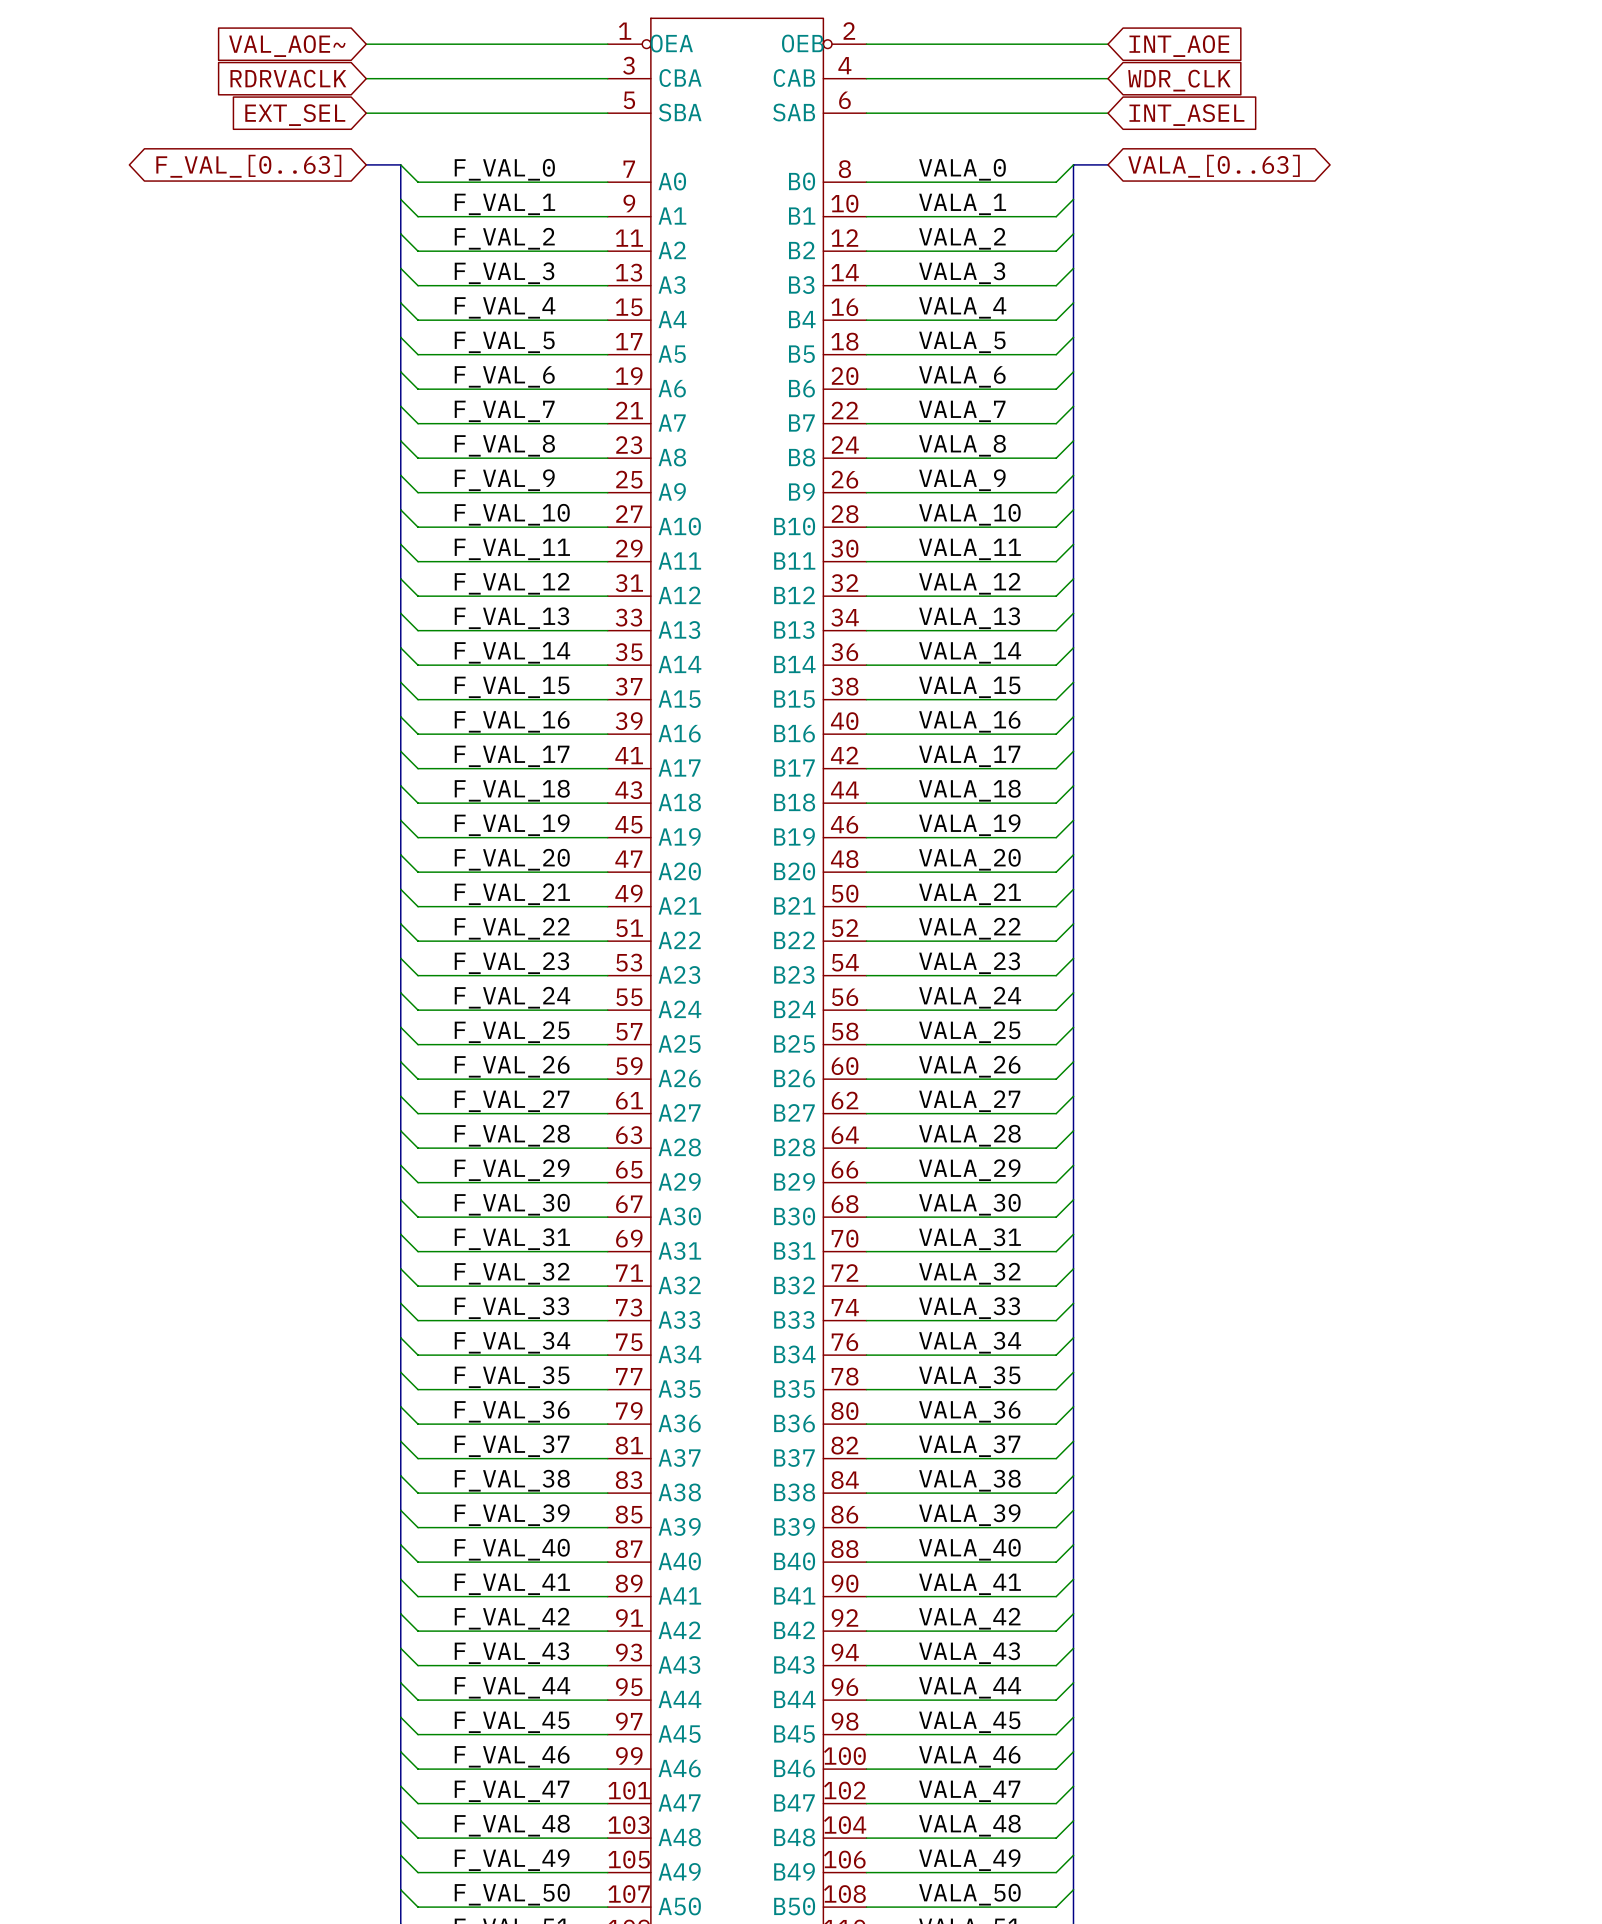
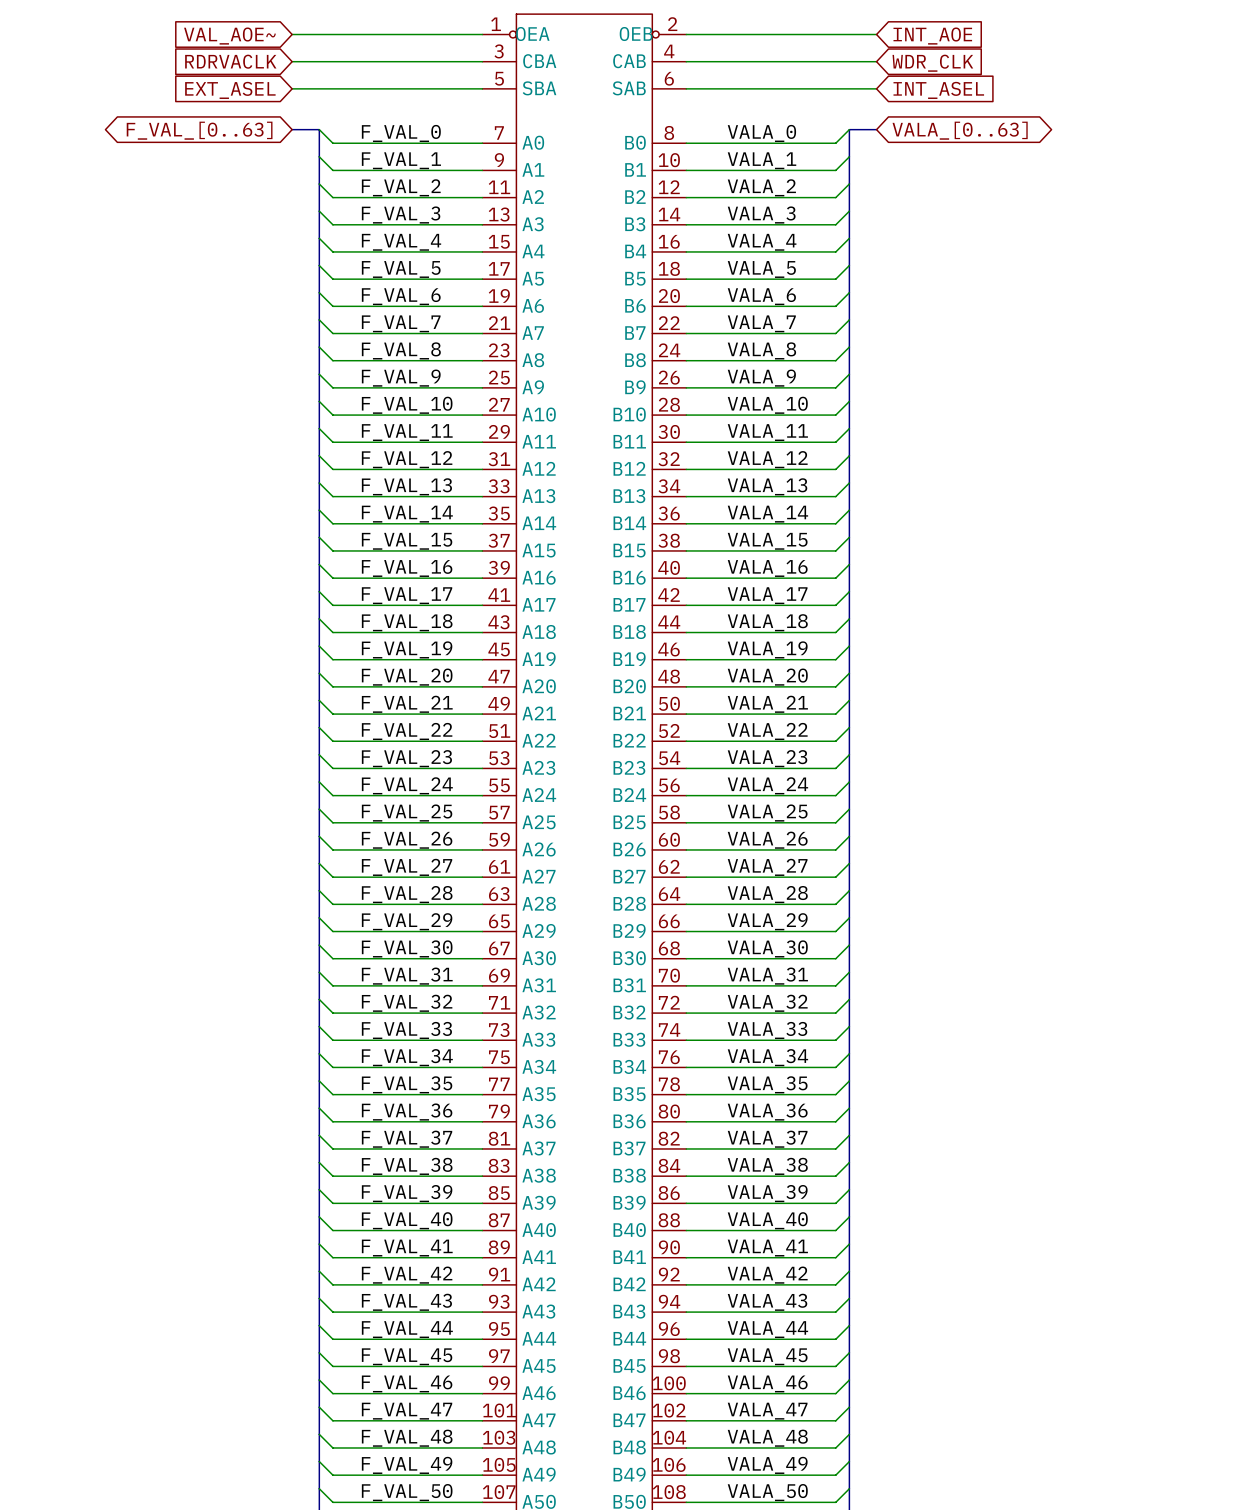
global label: EXT_SEL (295, 115) -> EXT_ASEL (230, 90)

